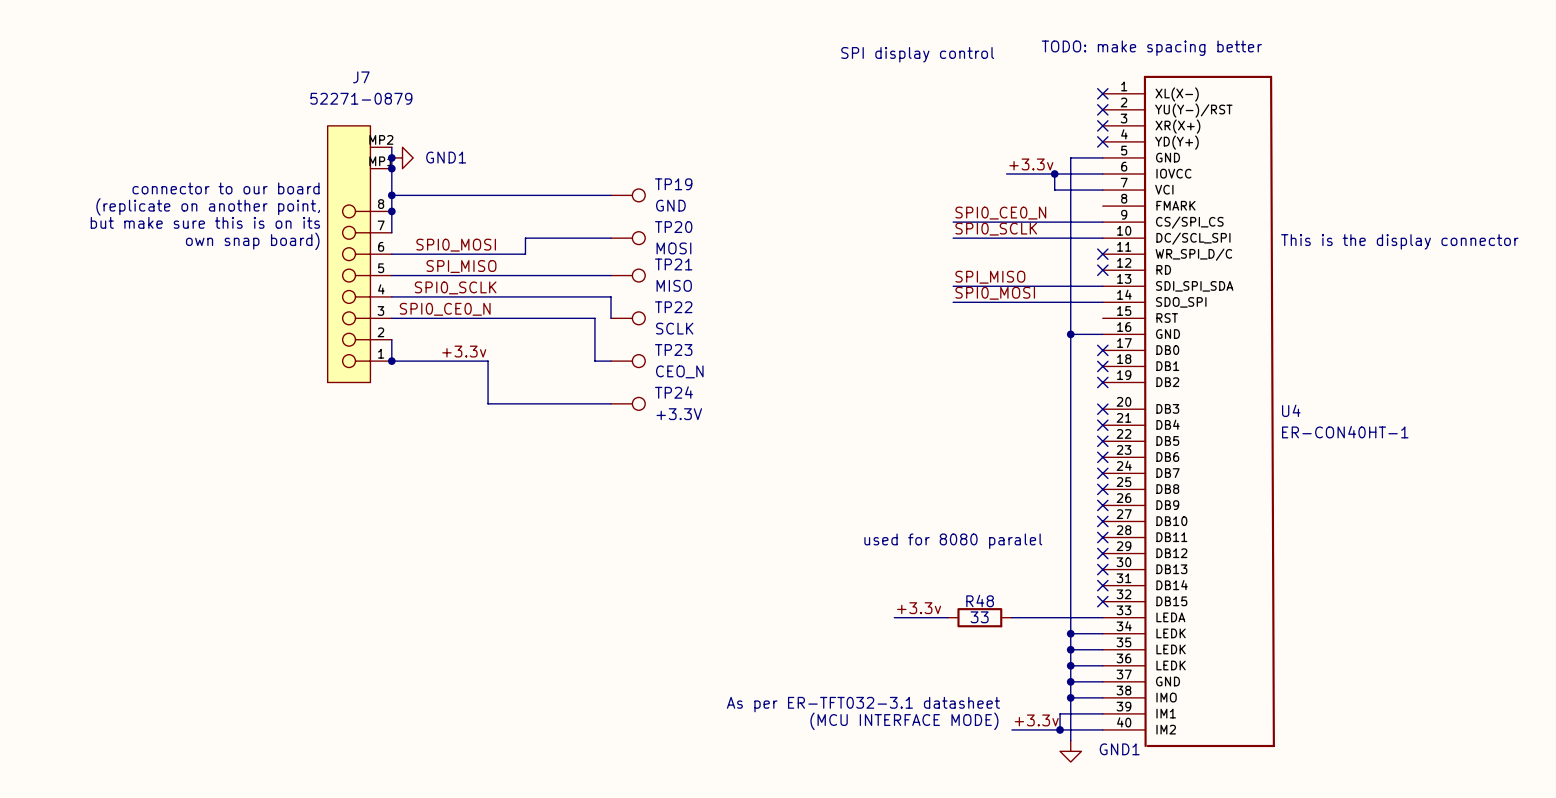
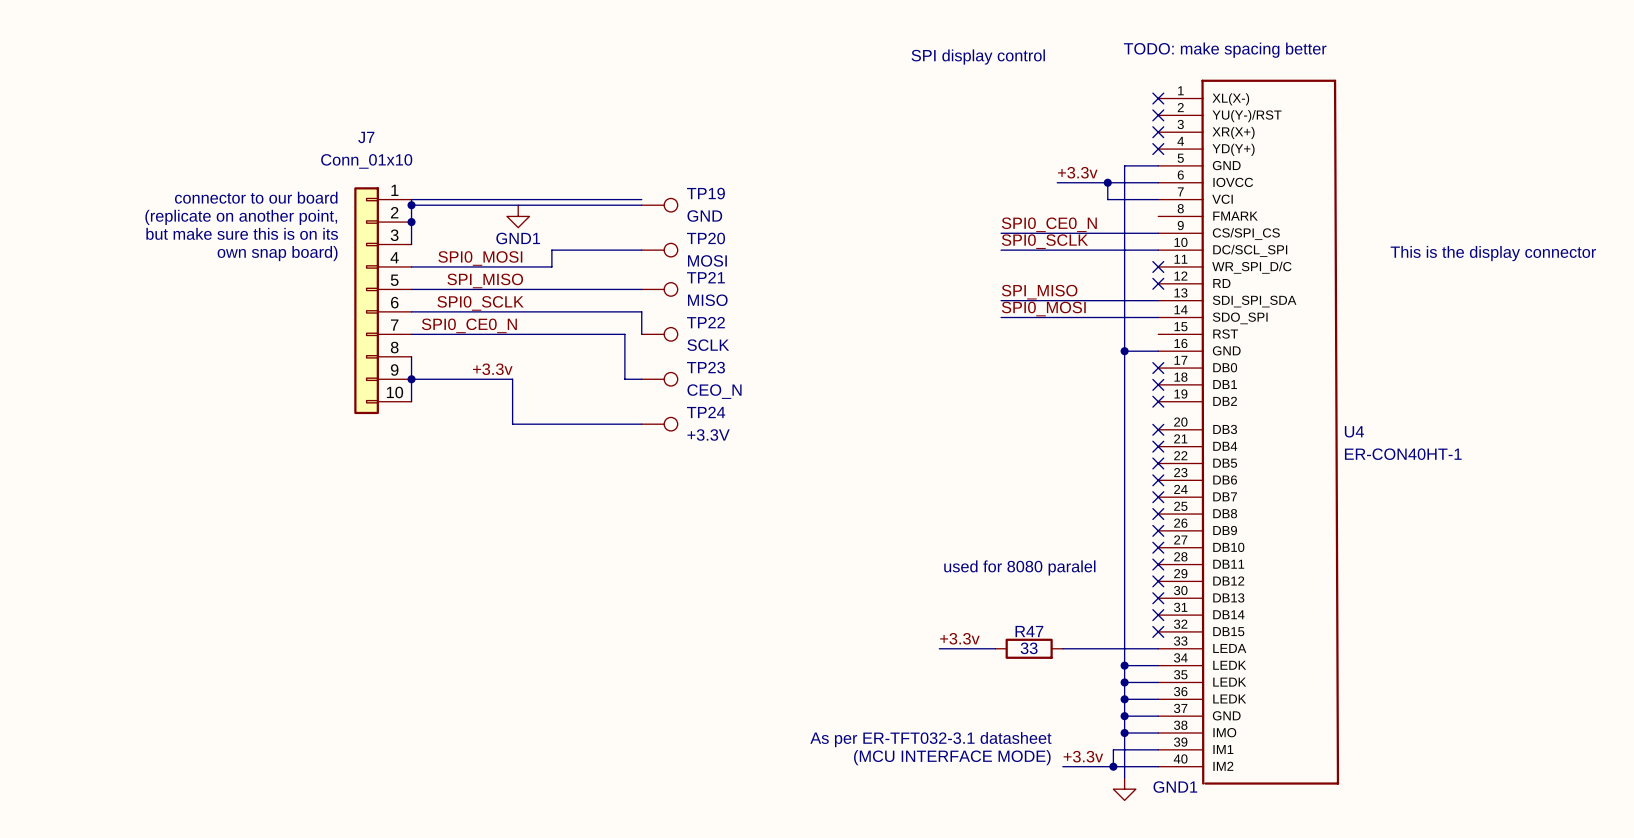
J7 name position: J7 (361, 77) -> J7 (366, 137)
J7 value: 52271-0879 (361, 98) -> Conn_01x10 (366, 161)
J7 symbol: [327, 125, 392, 383] -> [354, 187, 412, 415]
wire: (391, 147) (391, 190) -> (641, 199) (411, 199)
junction: (391, 157) -> none
power symbol rotation: 0° (402, 157) -> 90° clockwise (518, 216)
power symbol position: GND1 (402, 157) -> GND1 (518, 216)
power symbol text position: GND1 (446, 157) -> GND1 (518, 238)
junction: (391, 168) -> none
wire: none -> (411, 379) (411, 401)
R48 name: R48 (980, 601) -> R47 (1029, 631)

